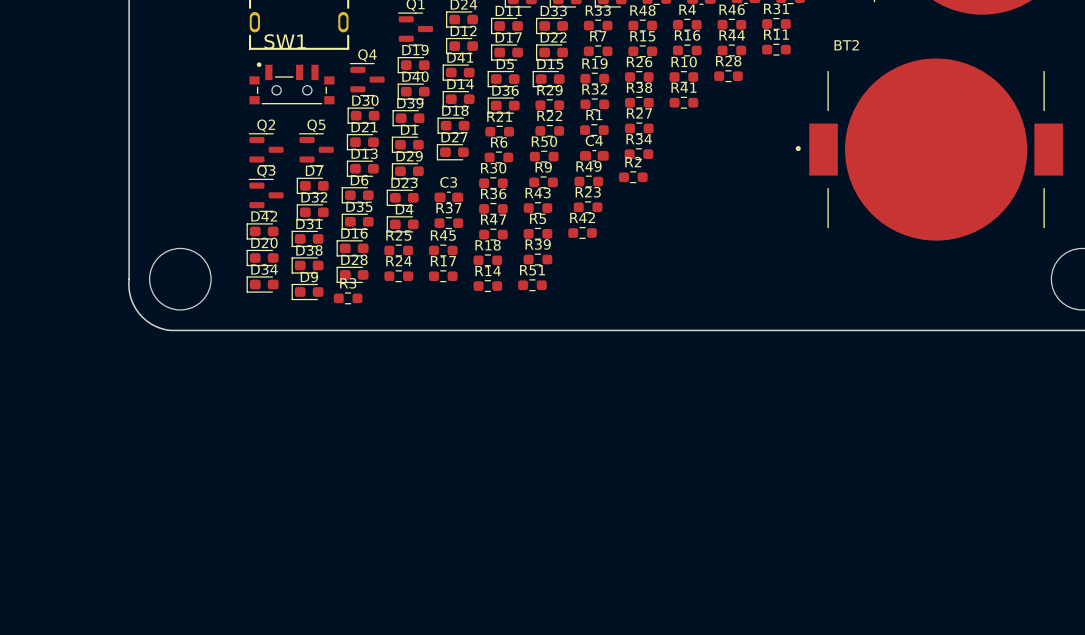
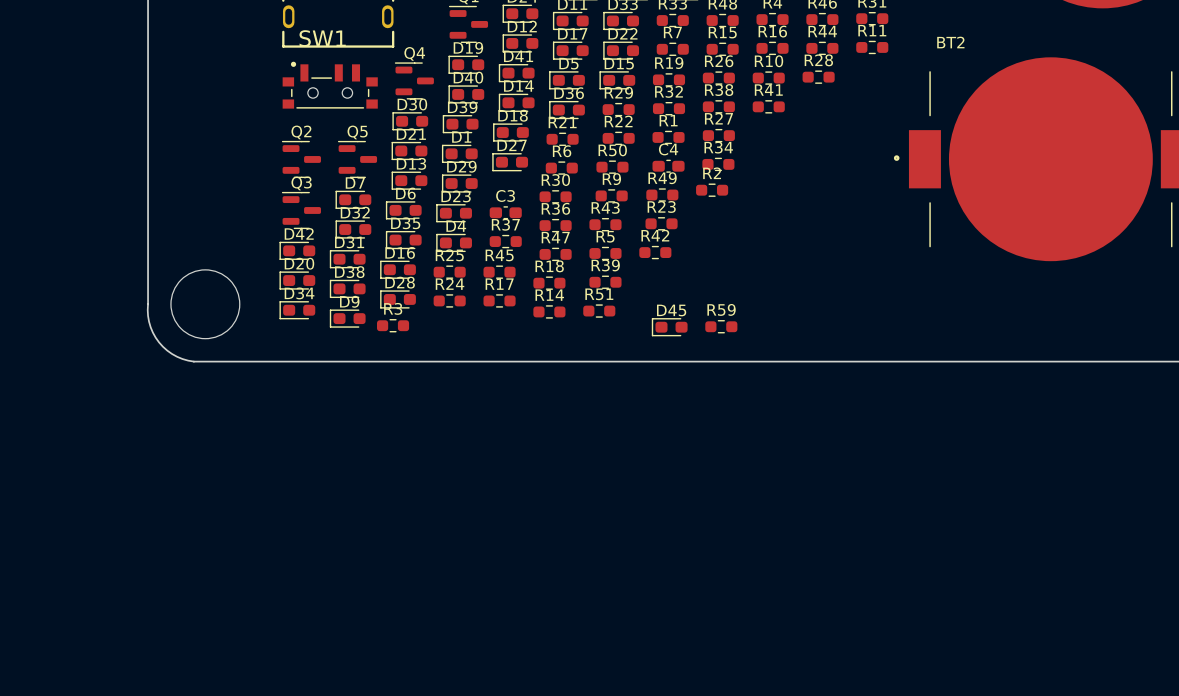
D45: none -> (669, 327)
R59: none -> (721, 326)

